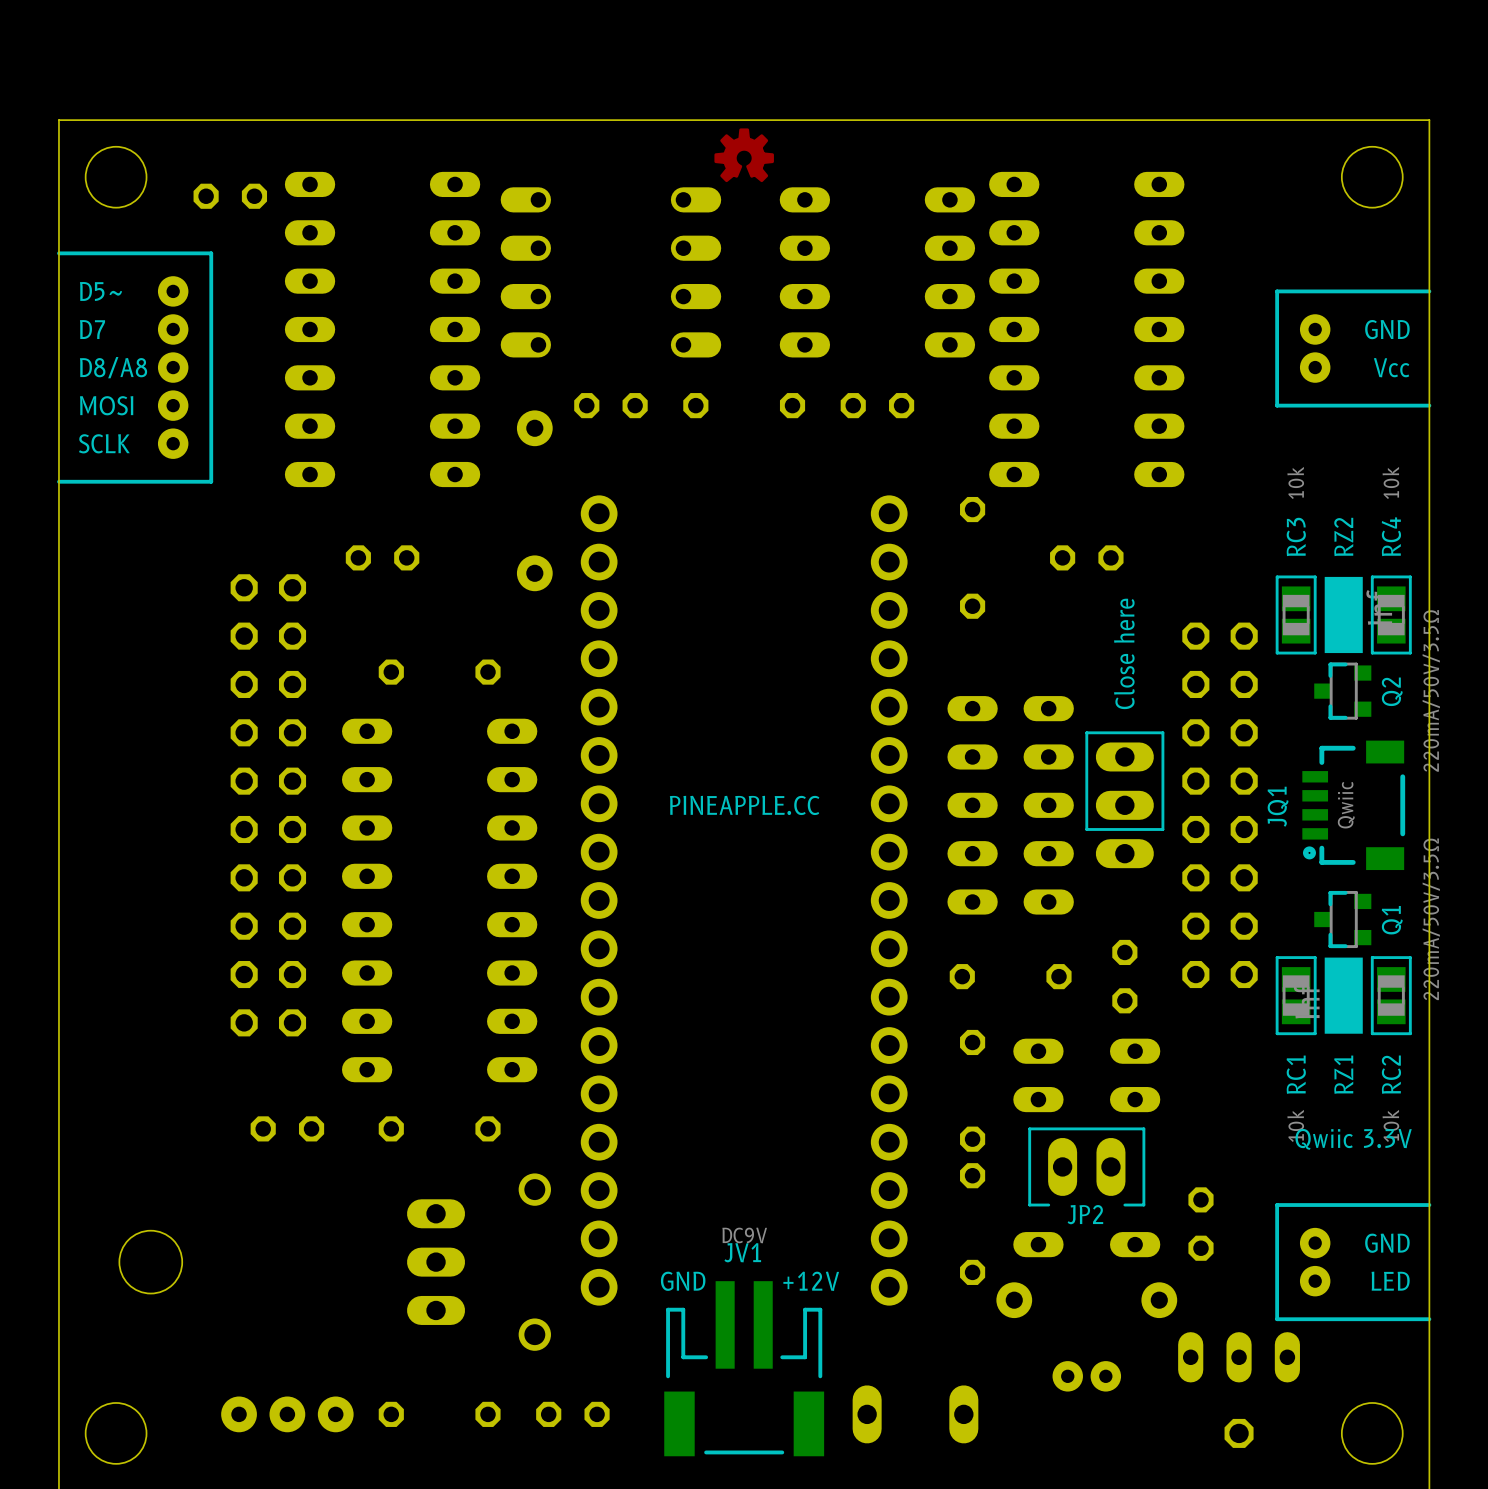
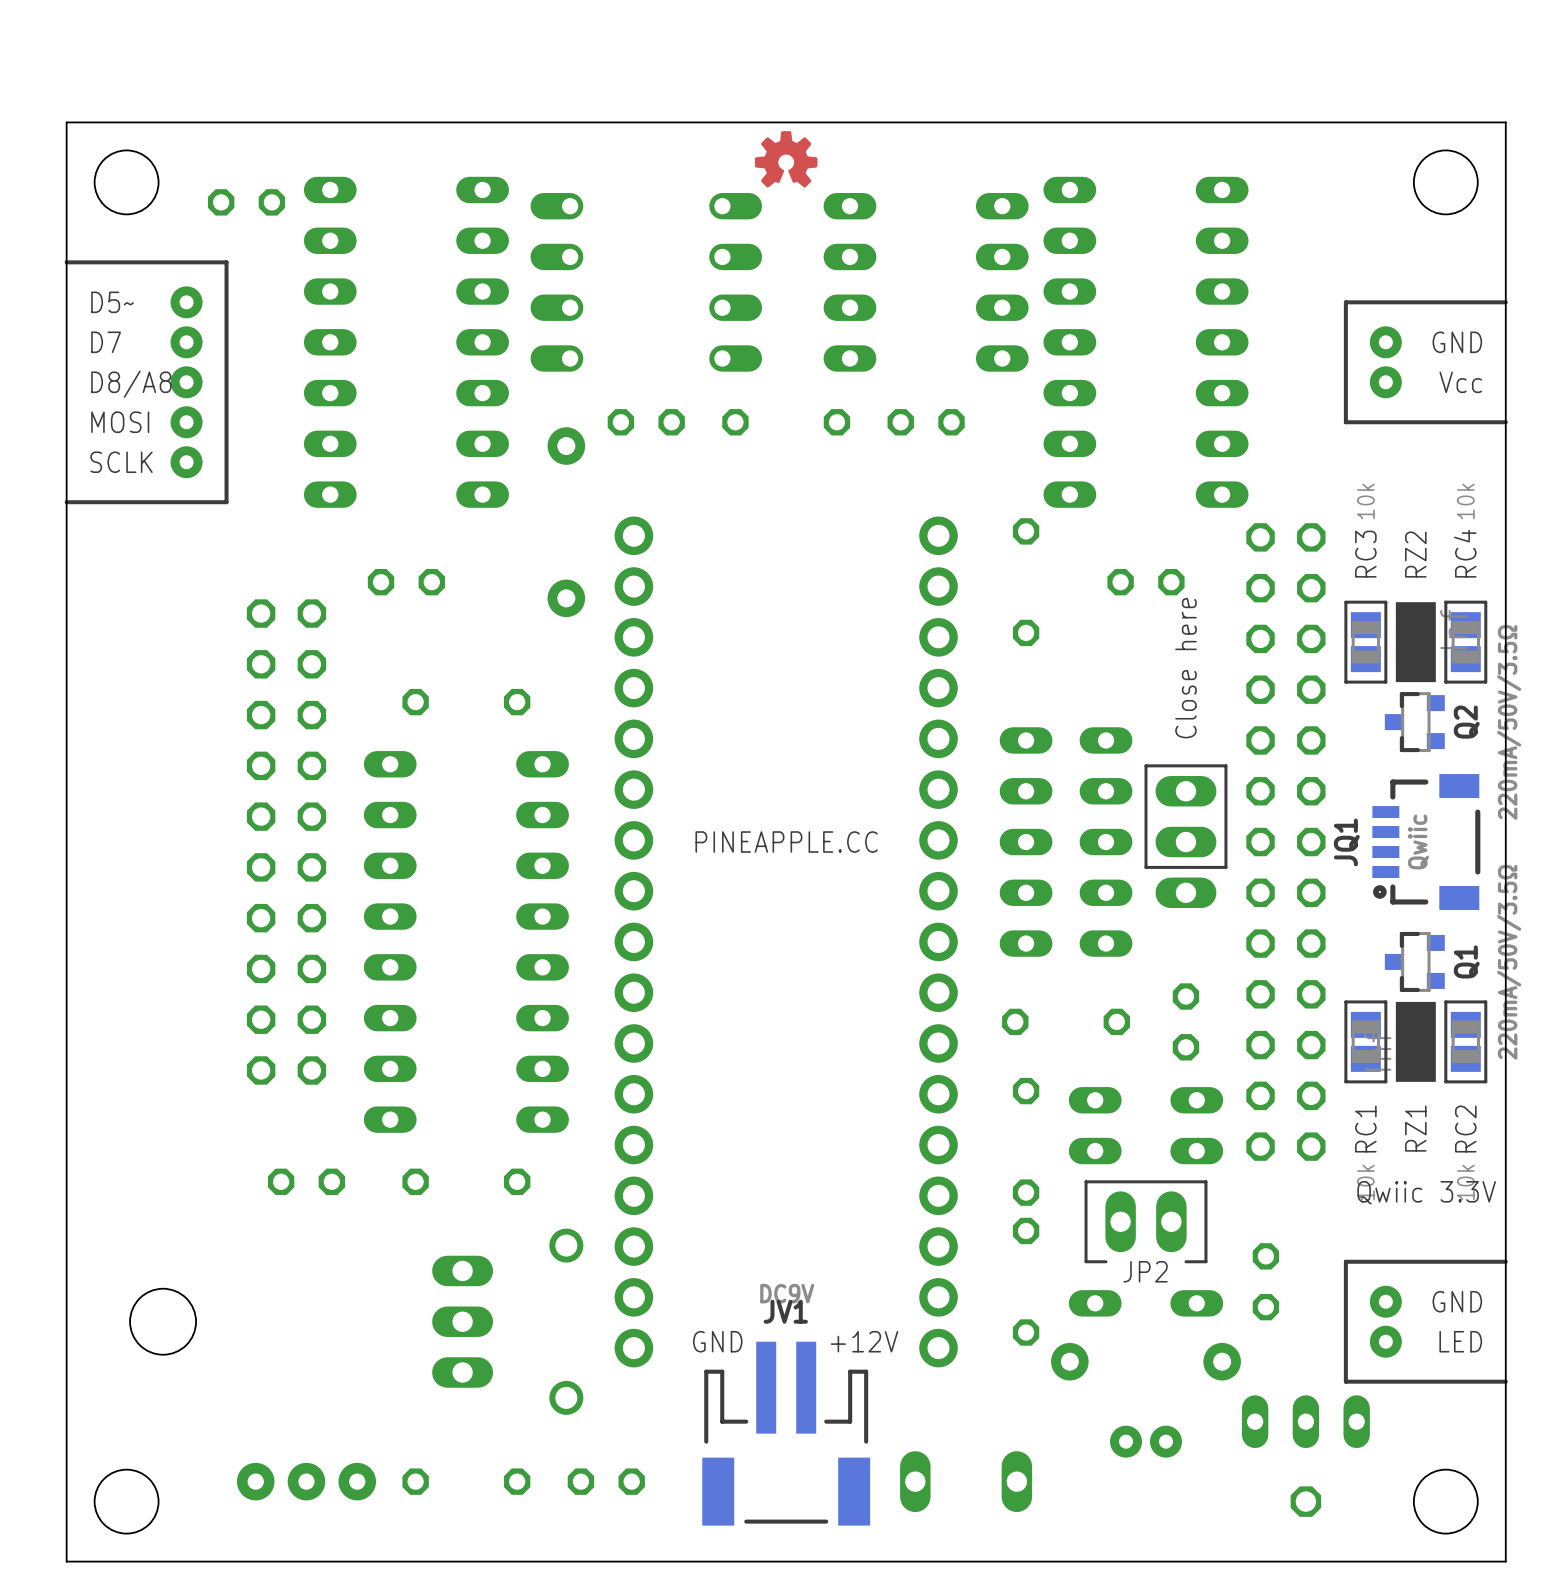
part footprint: [1182, 622, 1258, 989] -> [1246, 523, 1326, 1161]

